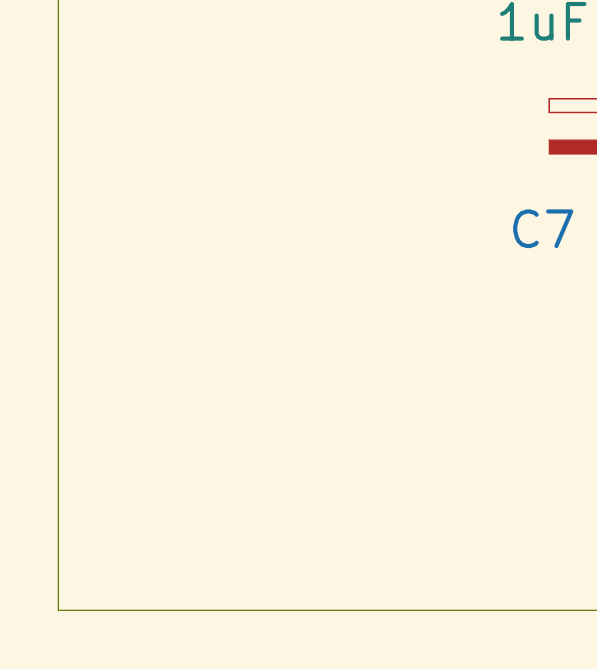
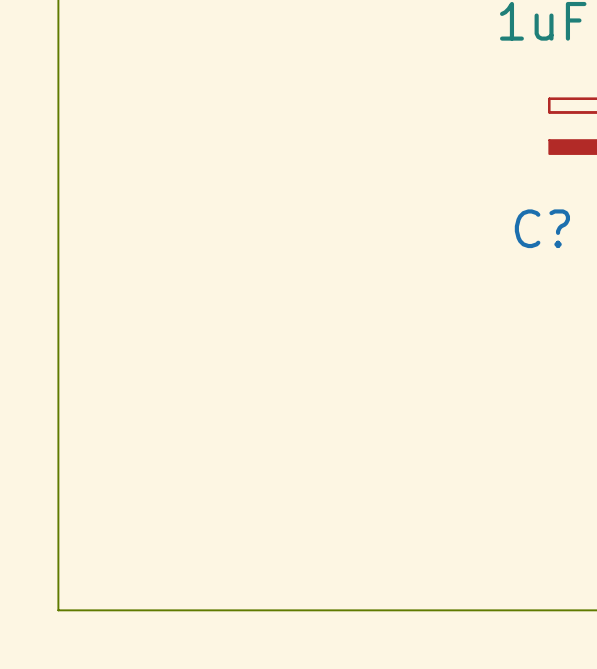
C7 name: C7 (543, 228) -> C? (542, 228)

